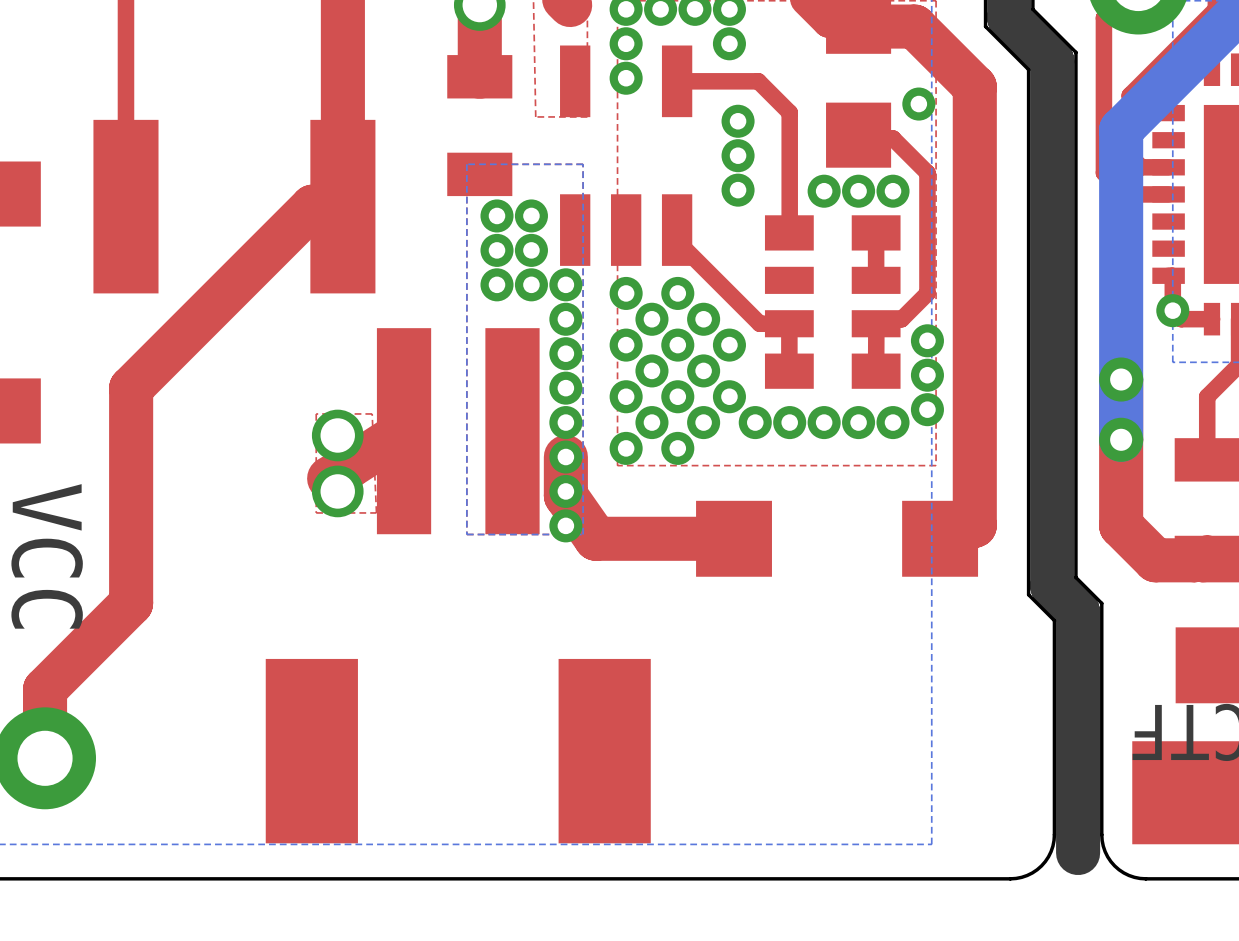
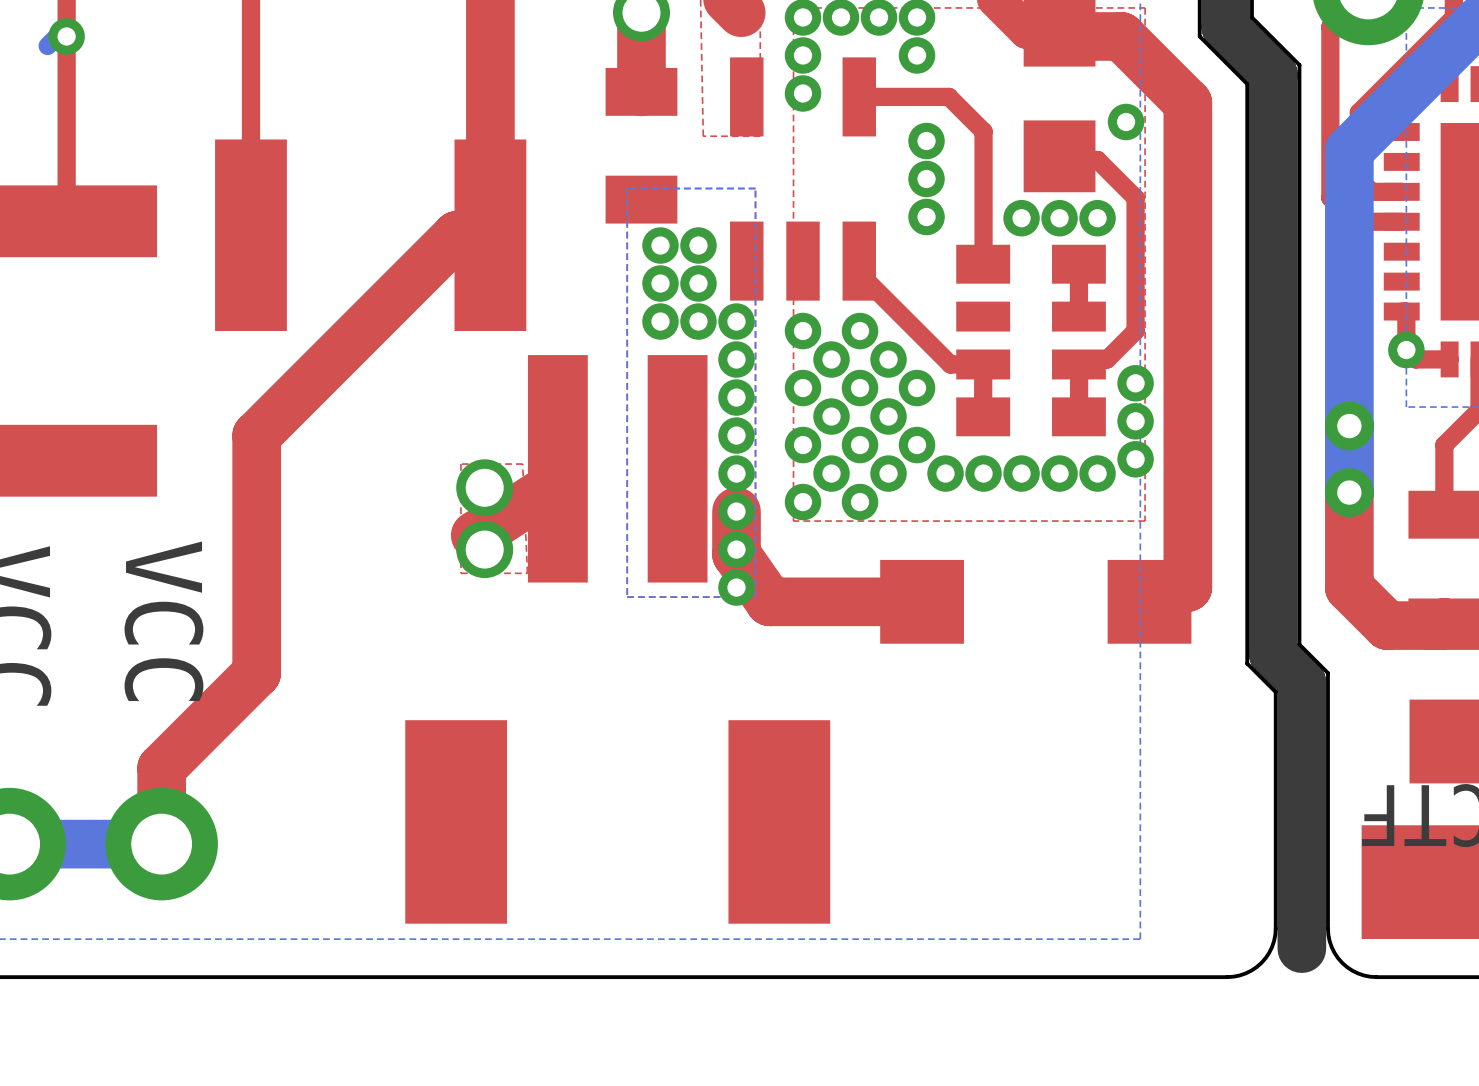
part position: (458, 585) -> (617, 639)

